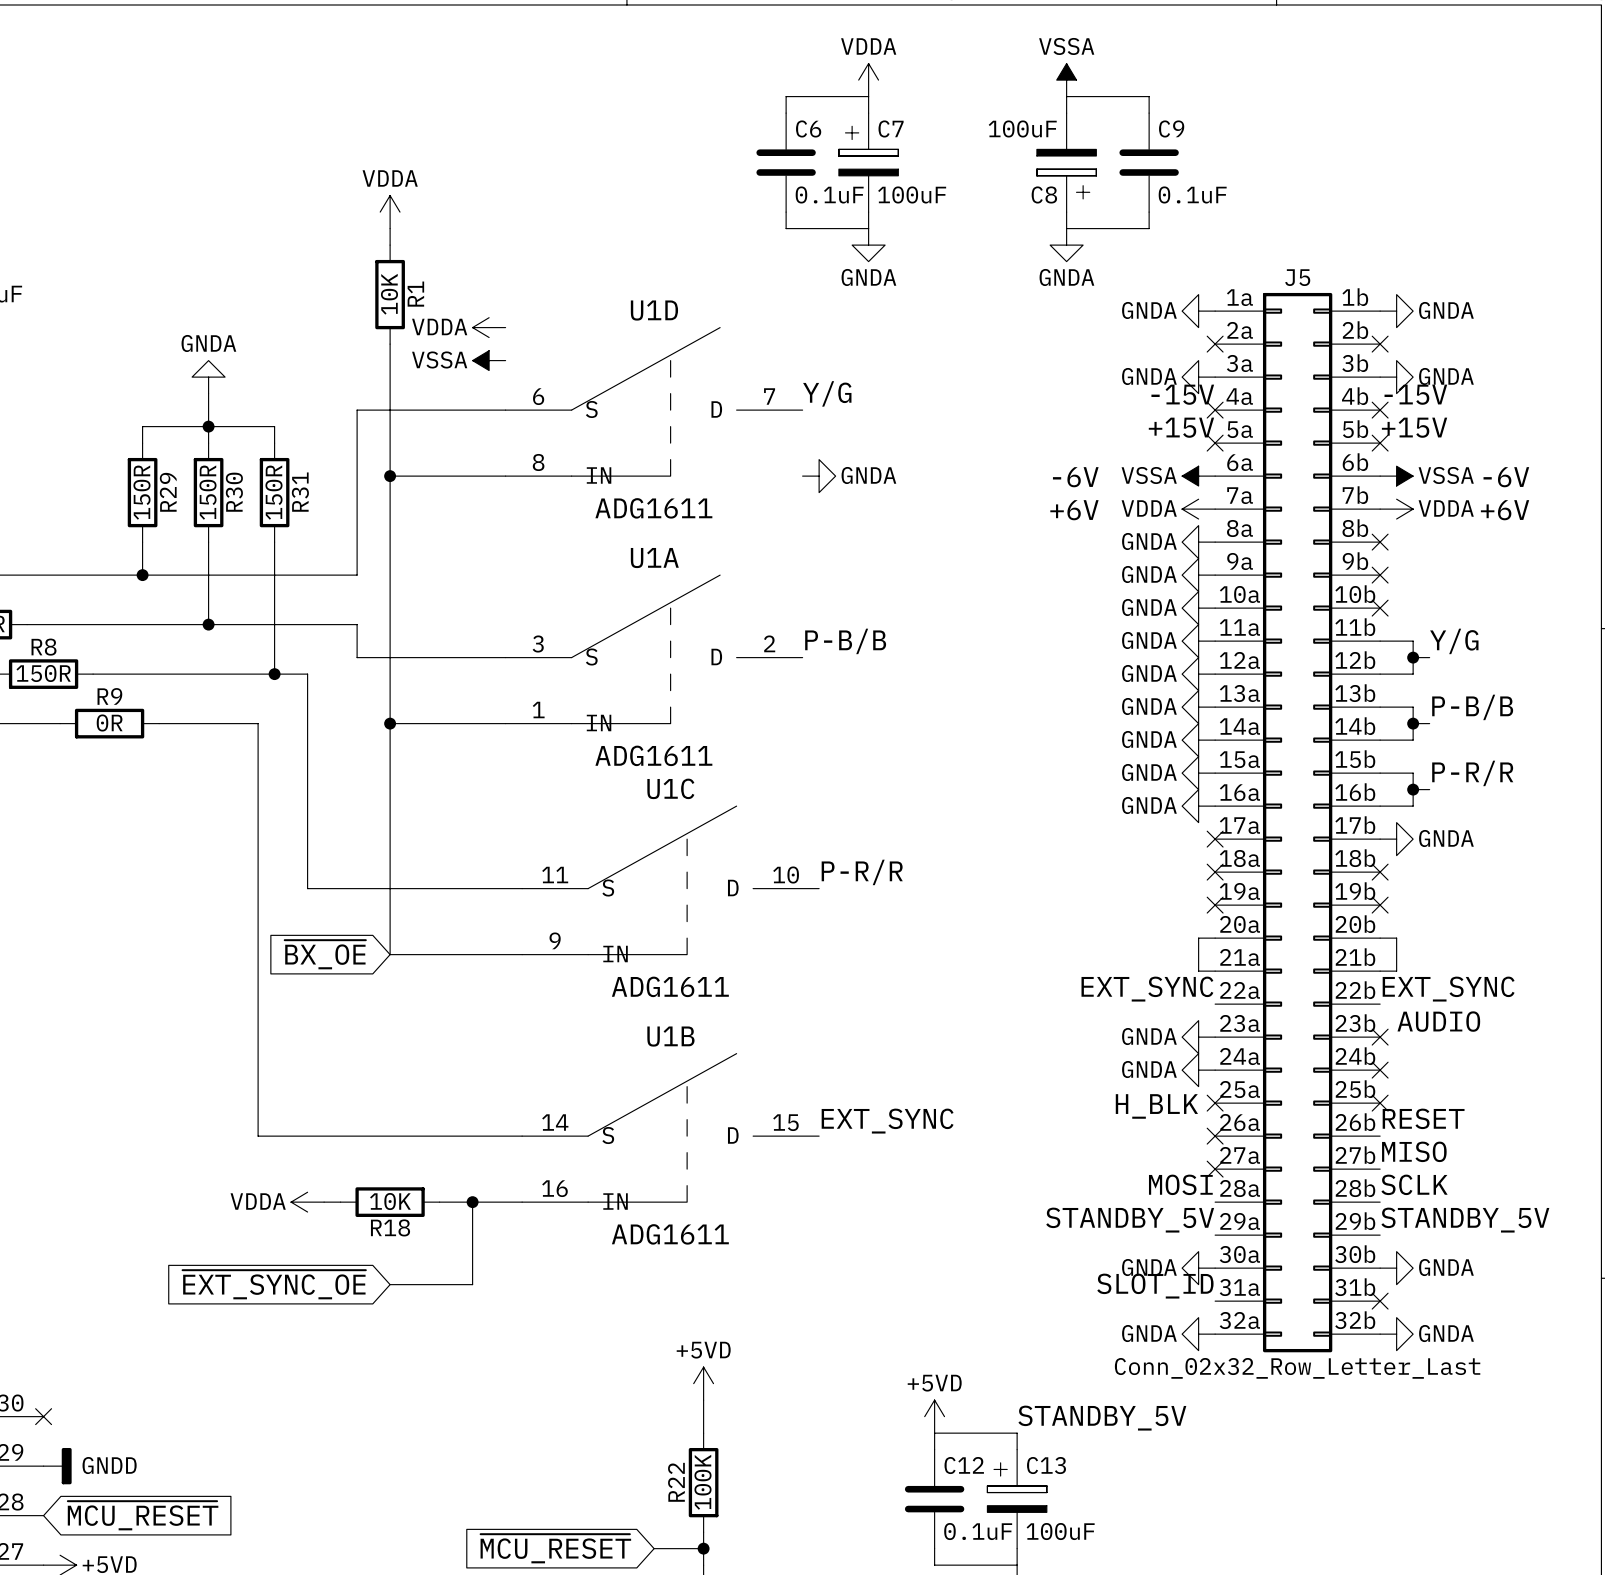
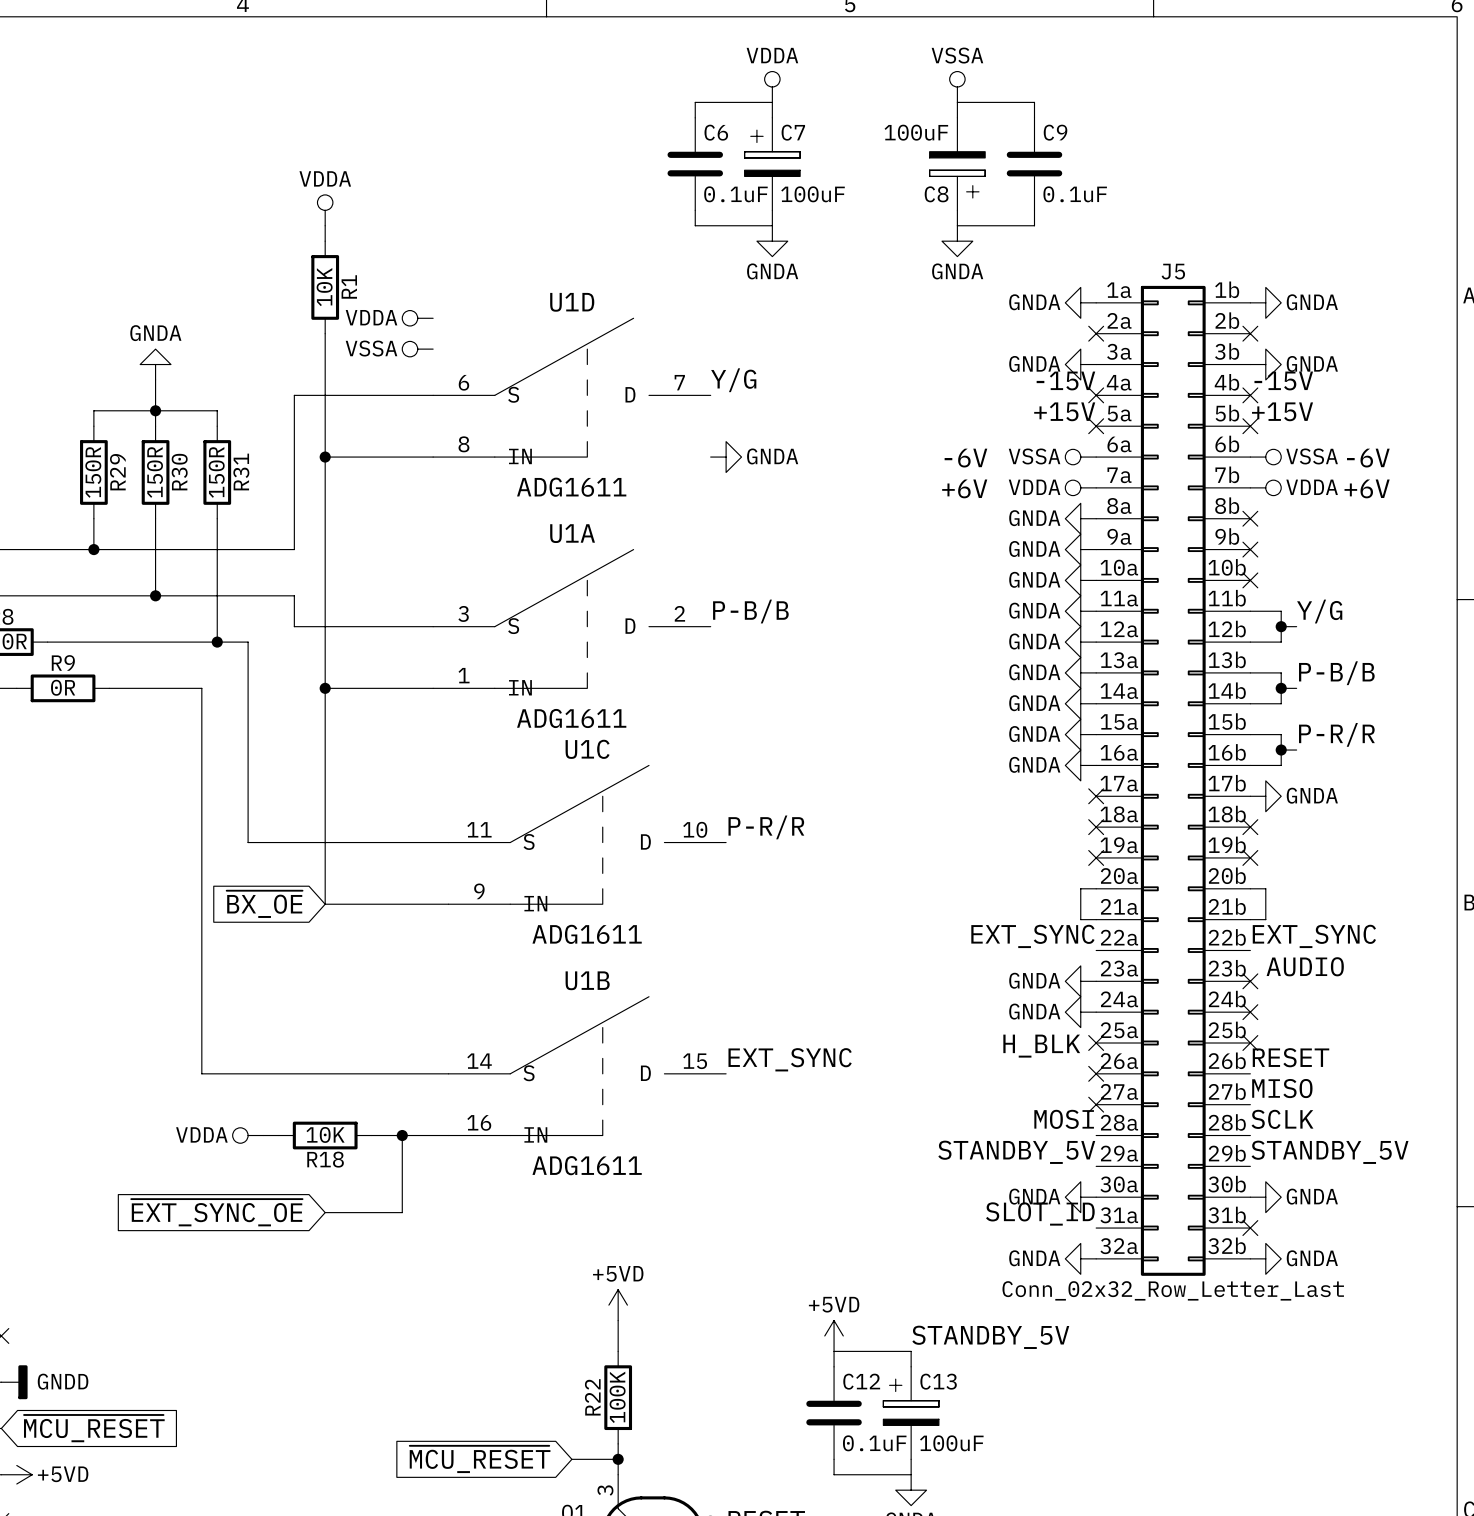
power symbol shape: [858, 63, 879, 97] -> [764, 71, 781, 103]
power symbol shape: [1056, 63, 1077, 97] -> [949, 71, 966, 103]
power symbol shape: [380, 195, 401, 229] -> [317, 194, 333, 226]
power symbol shape: [472, 317, 506, 338] -> [402, 310, 434, 326]
power symbol shape: [472, 350, 506, 371] -> [402, 341, 434, 357]
power symbol shape: [1182, 466, 1216, 487] -> [1065, 449, 1097, 465]
power symbol shape: [1380, 466, 1414, 487] -> [1250, 449, 1282, 465]
power symbol shape: [1182, 499, 1216, 520] -> [1065, 480, 1097, 496]
power symbol shape: [1380, 499, 1414, 520] -> [1250, 480, 1282, 496]
power symbol shape: [291, 1192, 325, 1213] -> [232, 1127, 264, 1144]

